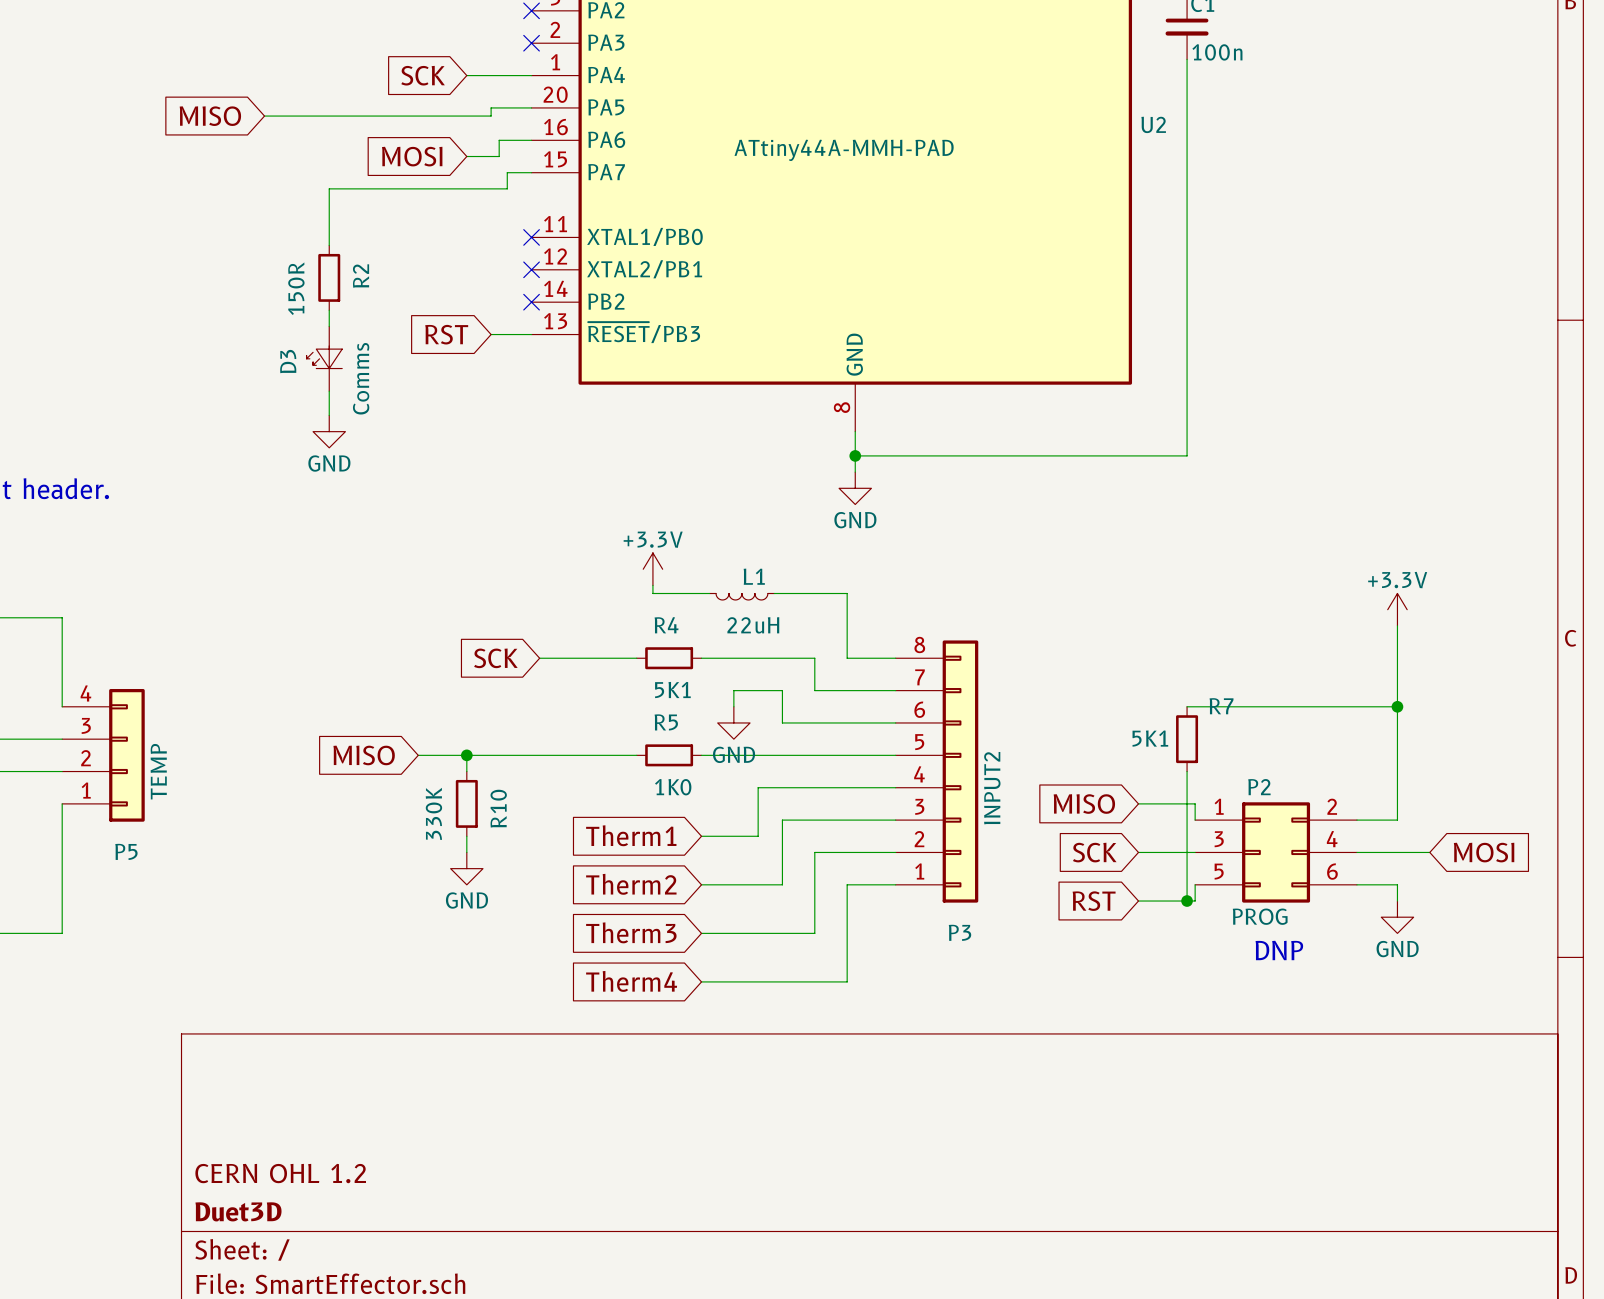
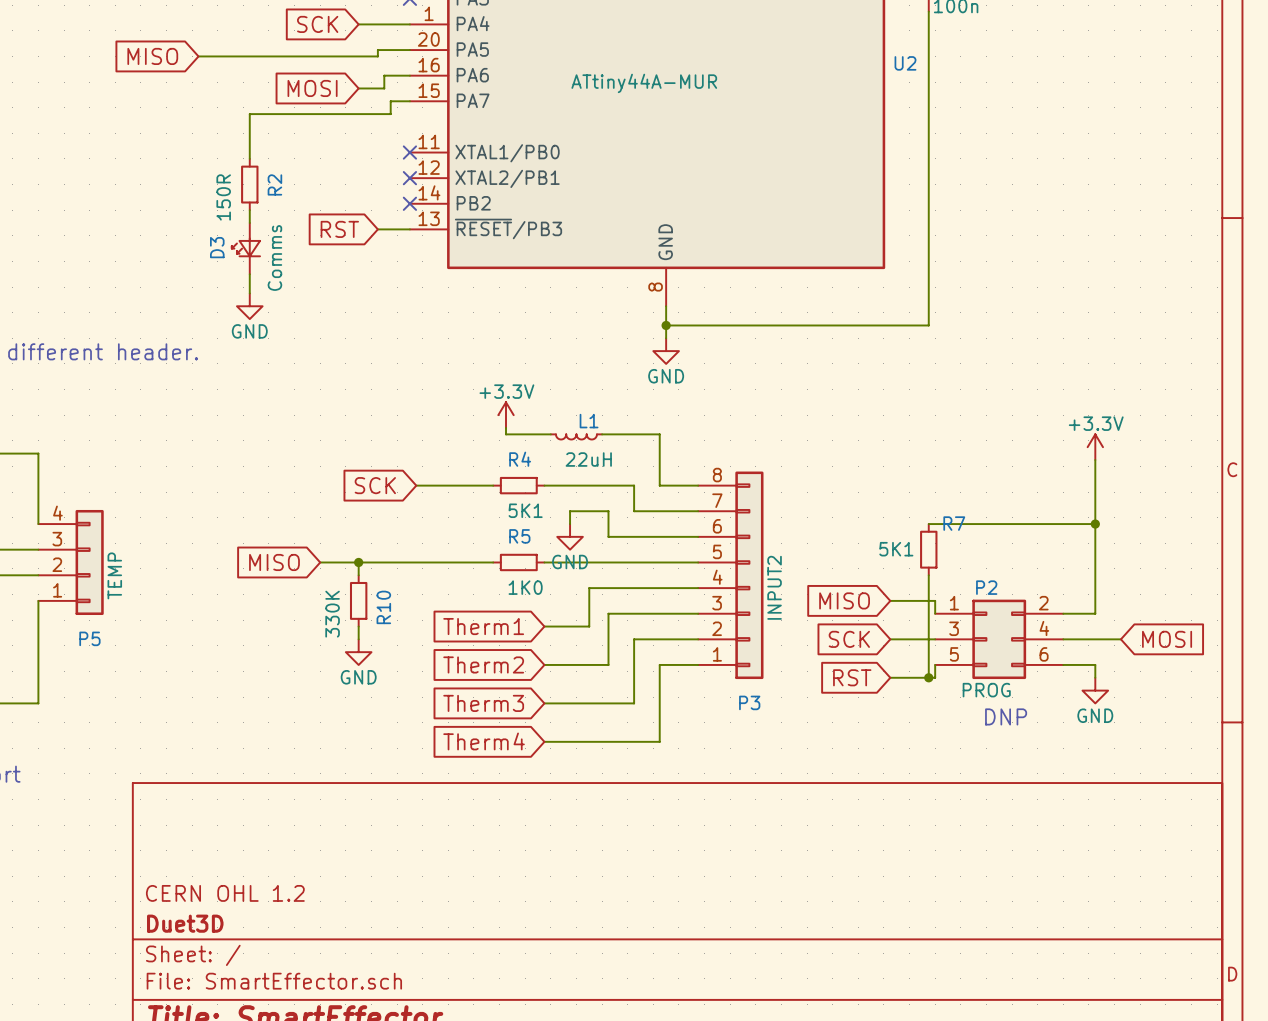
U2 value: ATtiny44A-MMH-PAD (844, 150) -> ATtiny44A-MUR (644, 83)

